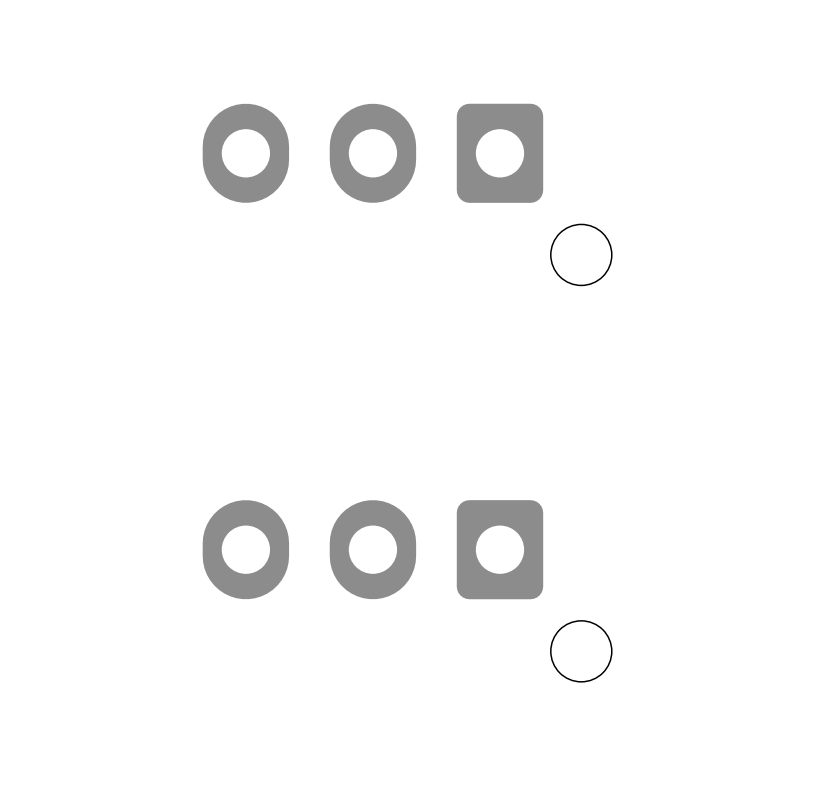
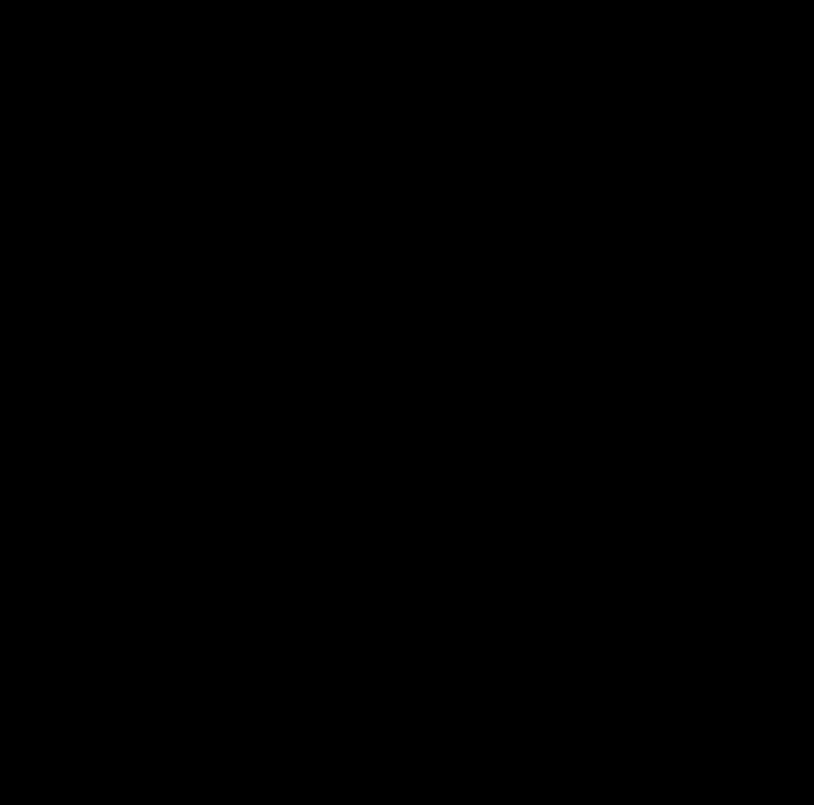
part: (407, 194) -> none
part: (407, 590) -> none

